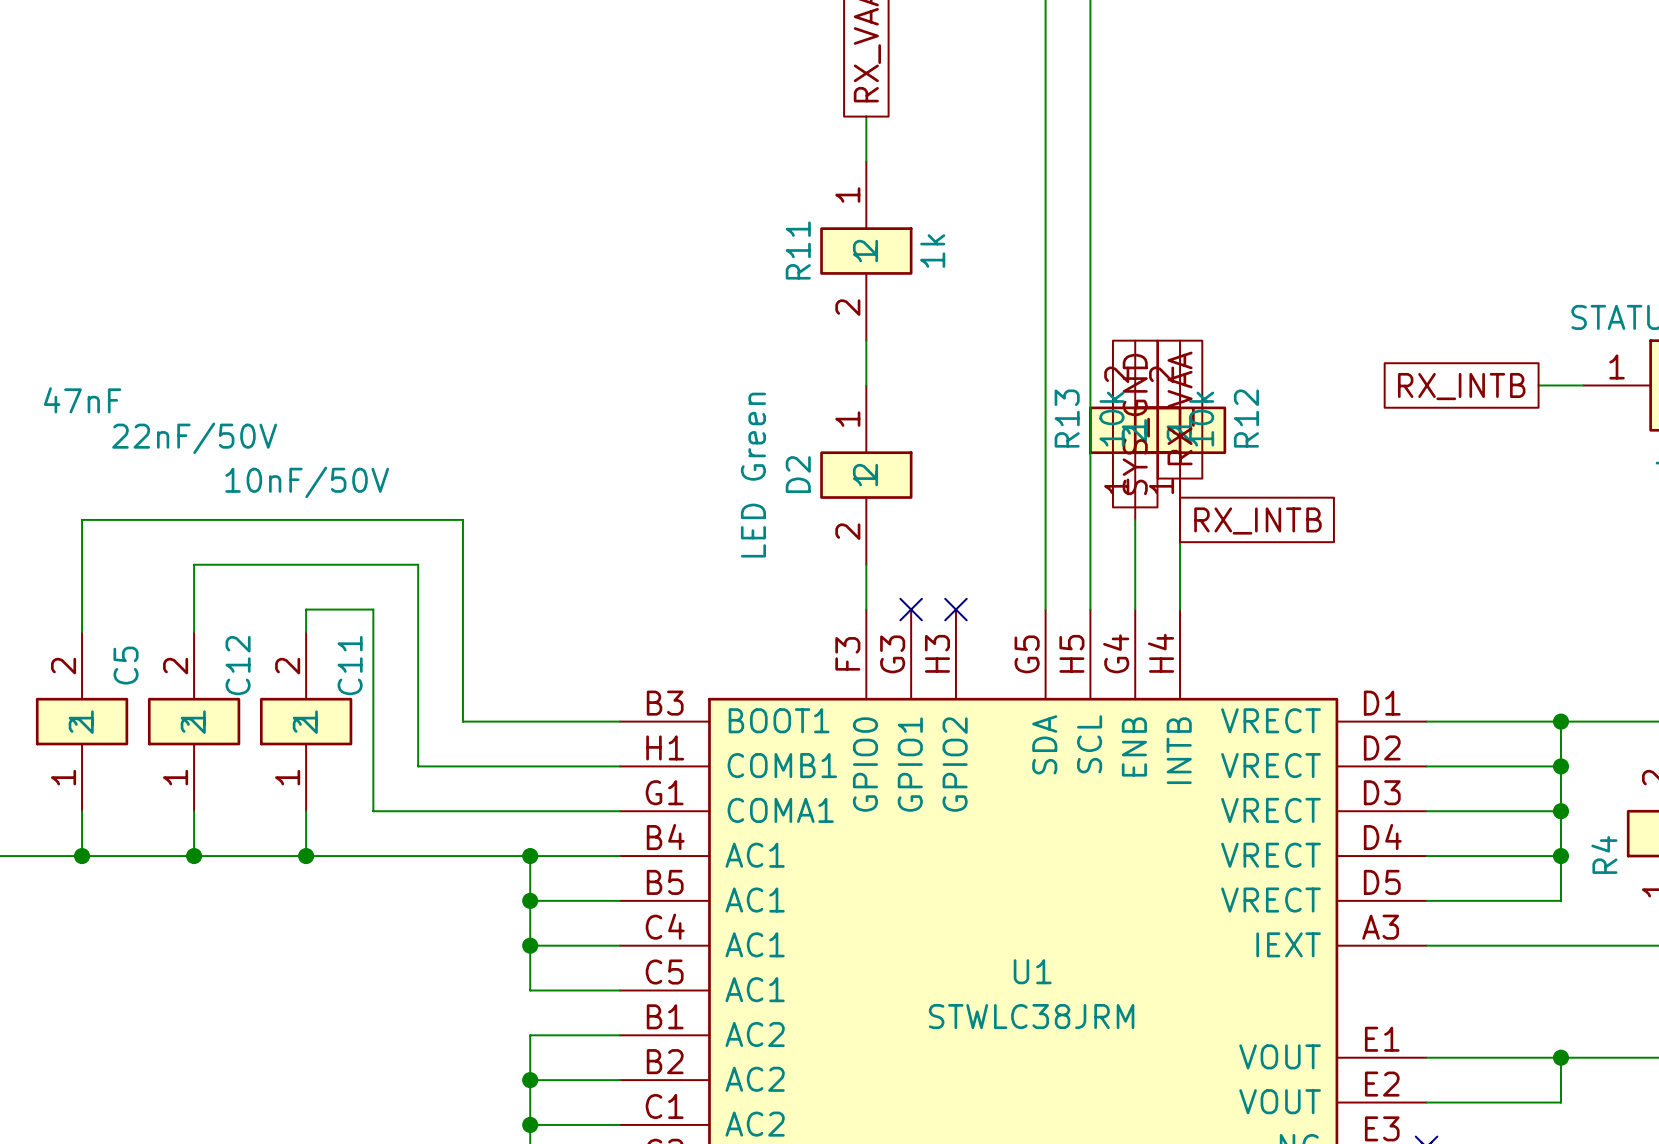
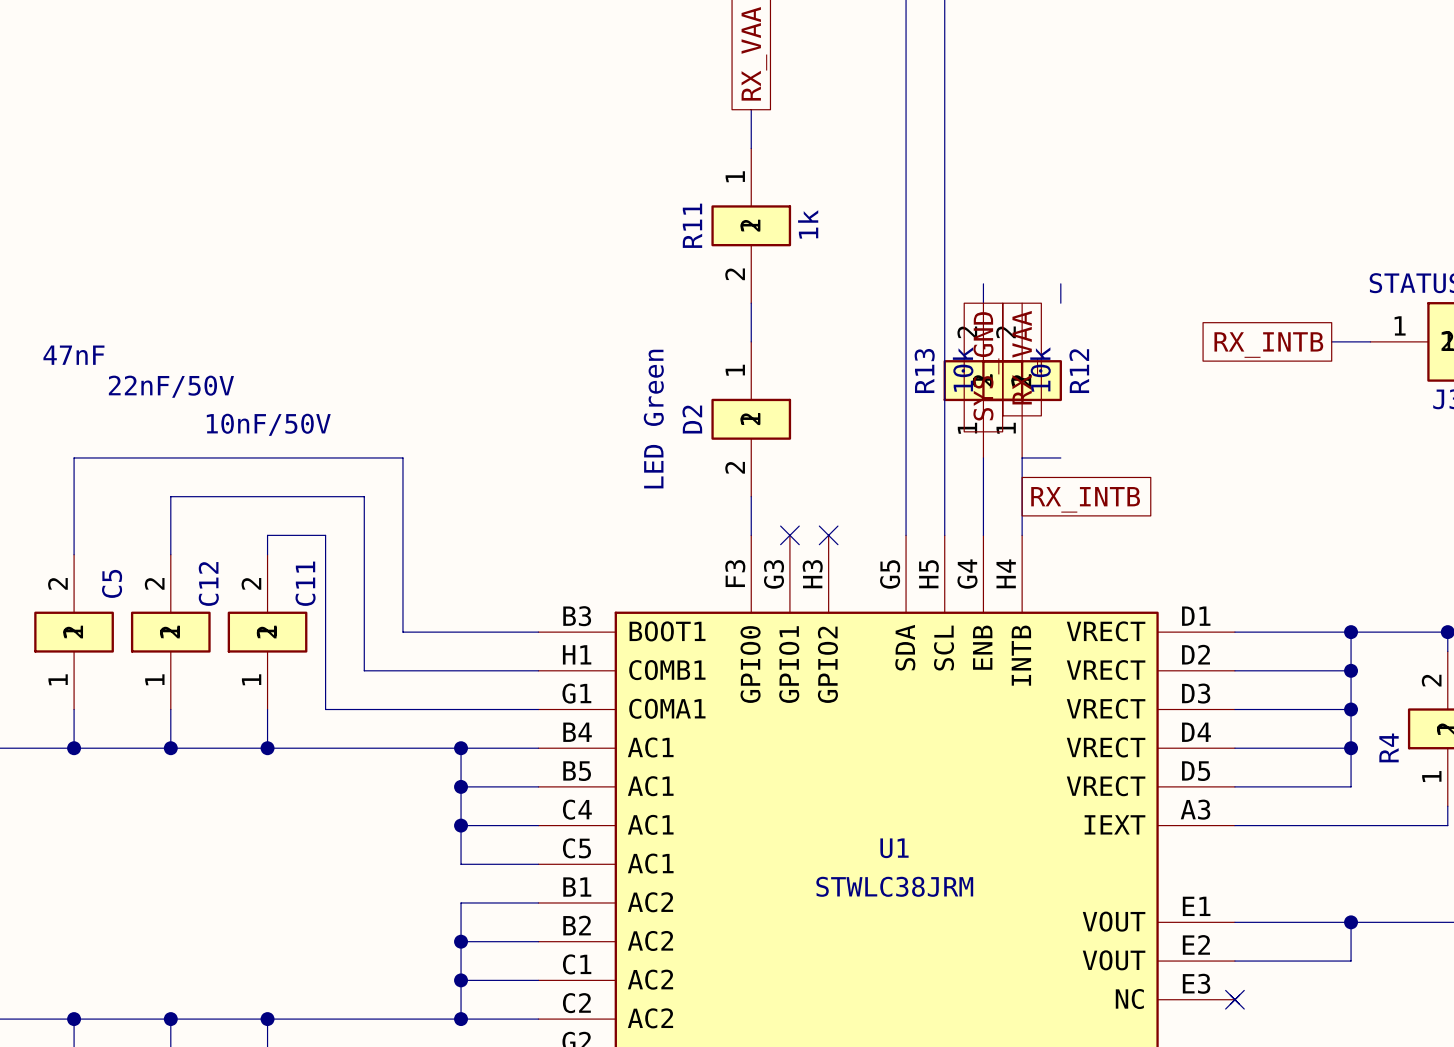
wire: none -> (983, 283) (983, 303)
wire: none -> (1060, 283) (1060, 303)
wire: none -> (1022, 457) (1060, 457)
global label position: RX_INTB (1257, 520) -> RX_INTB (1085, 499)

